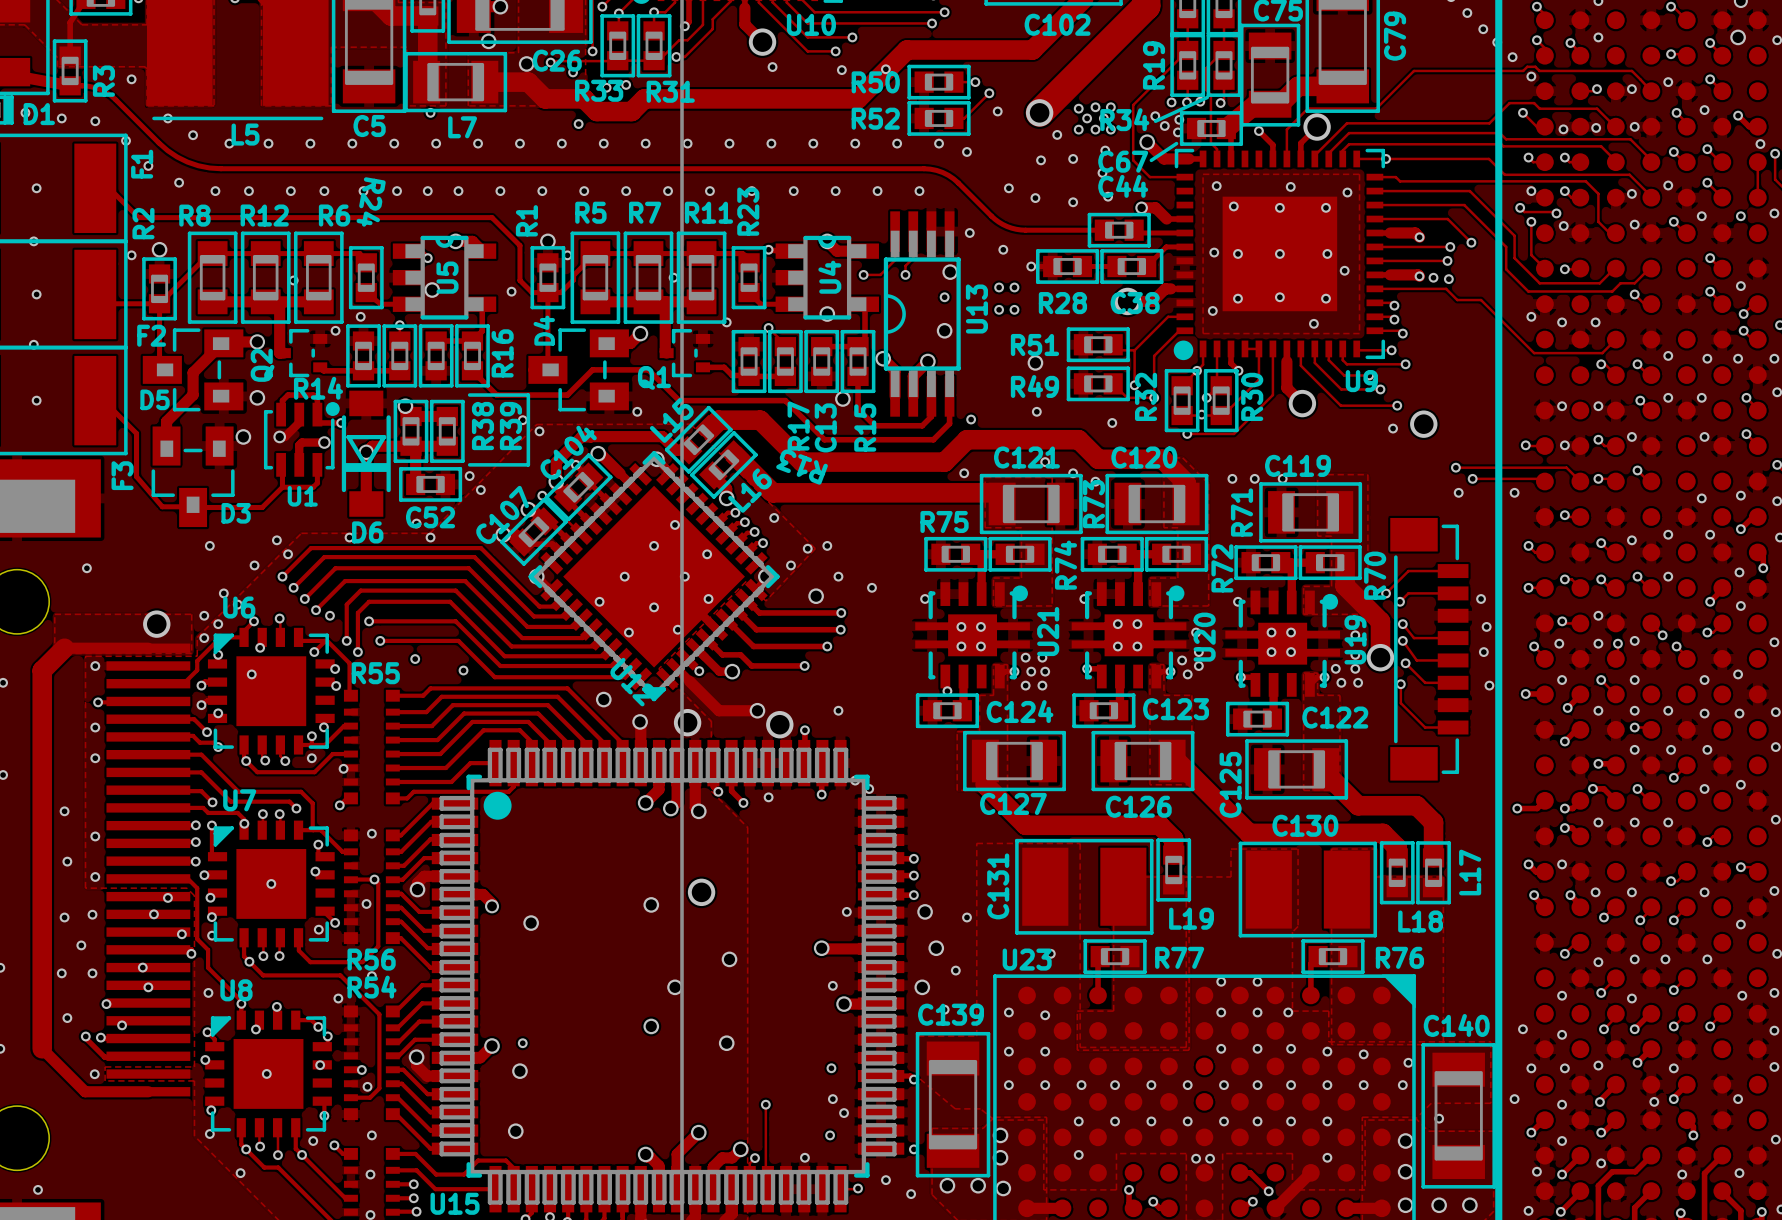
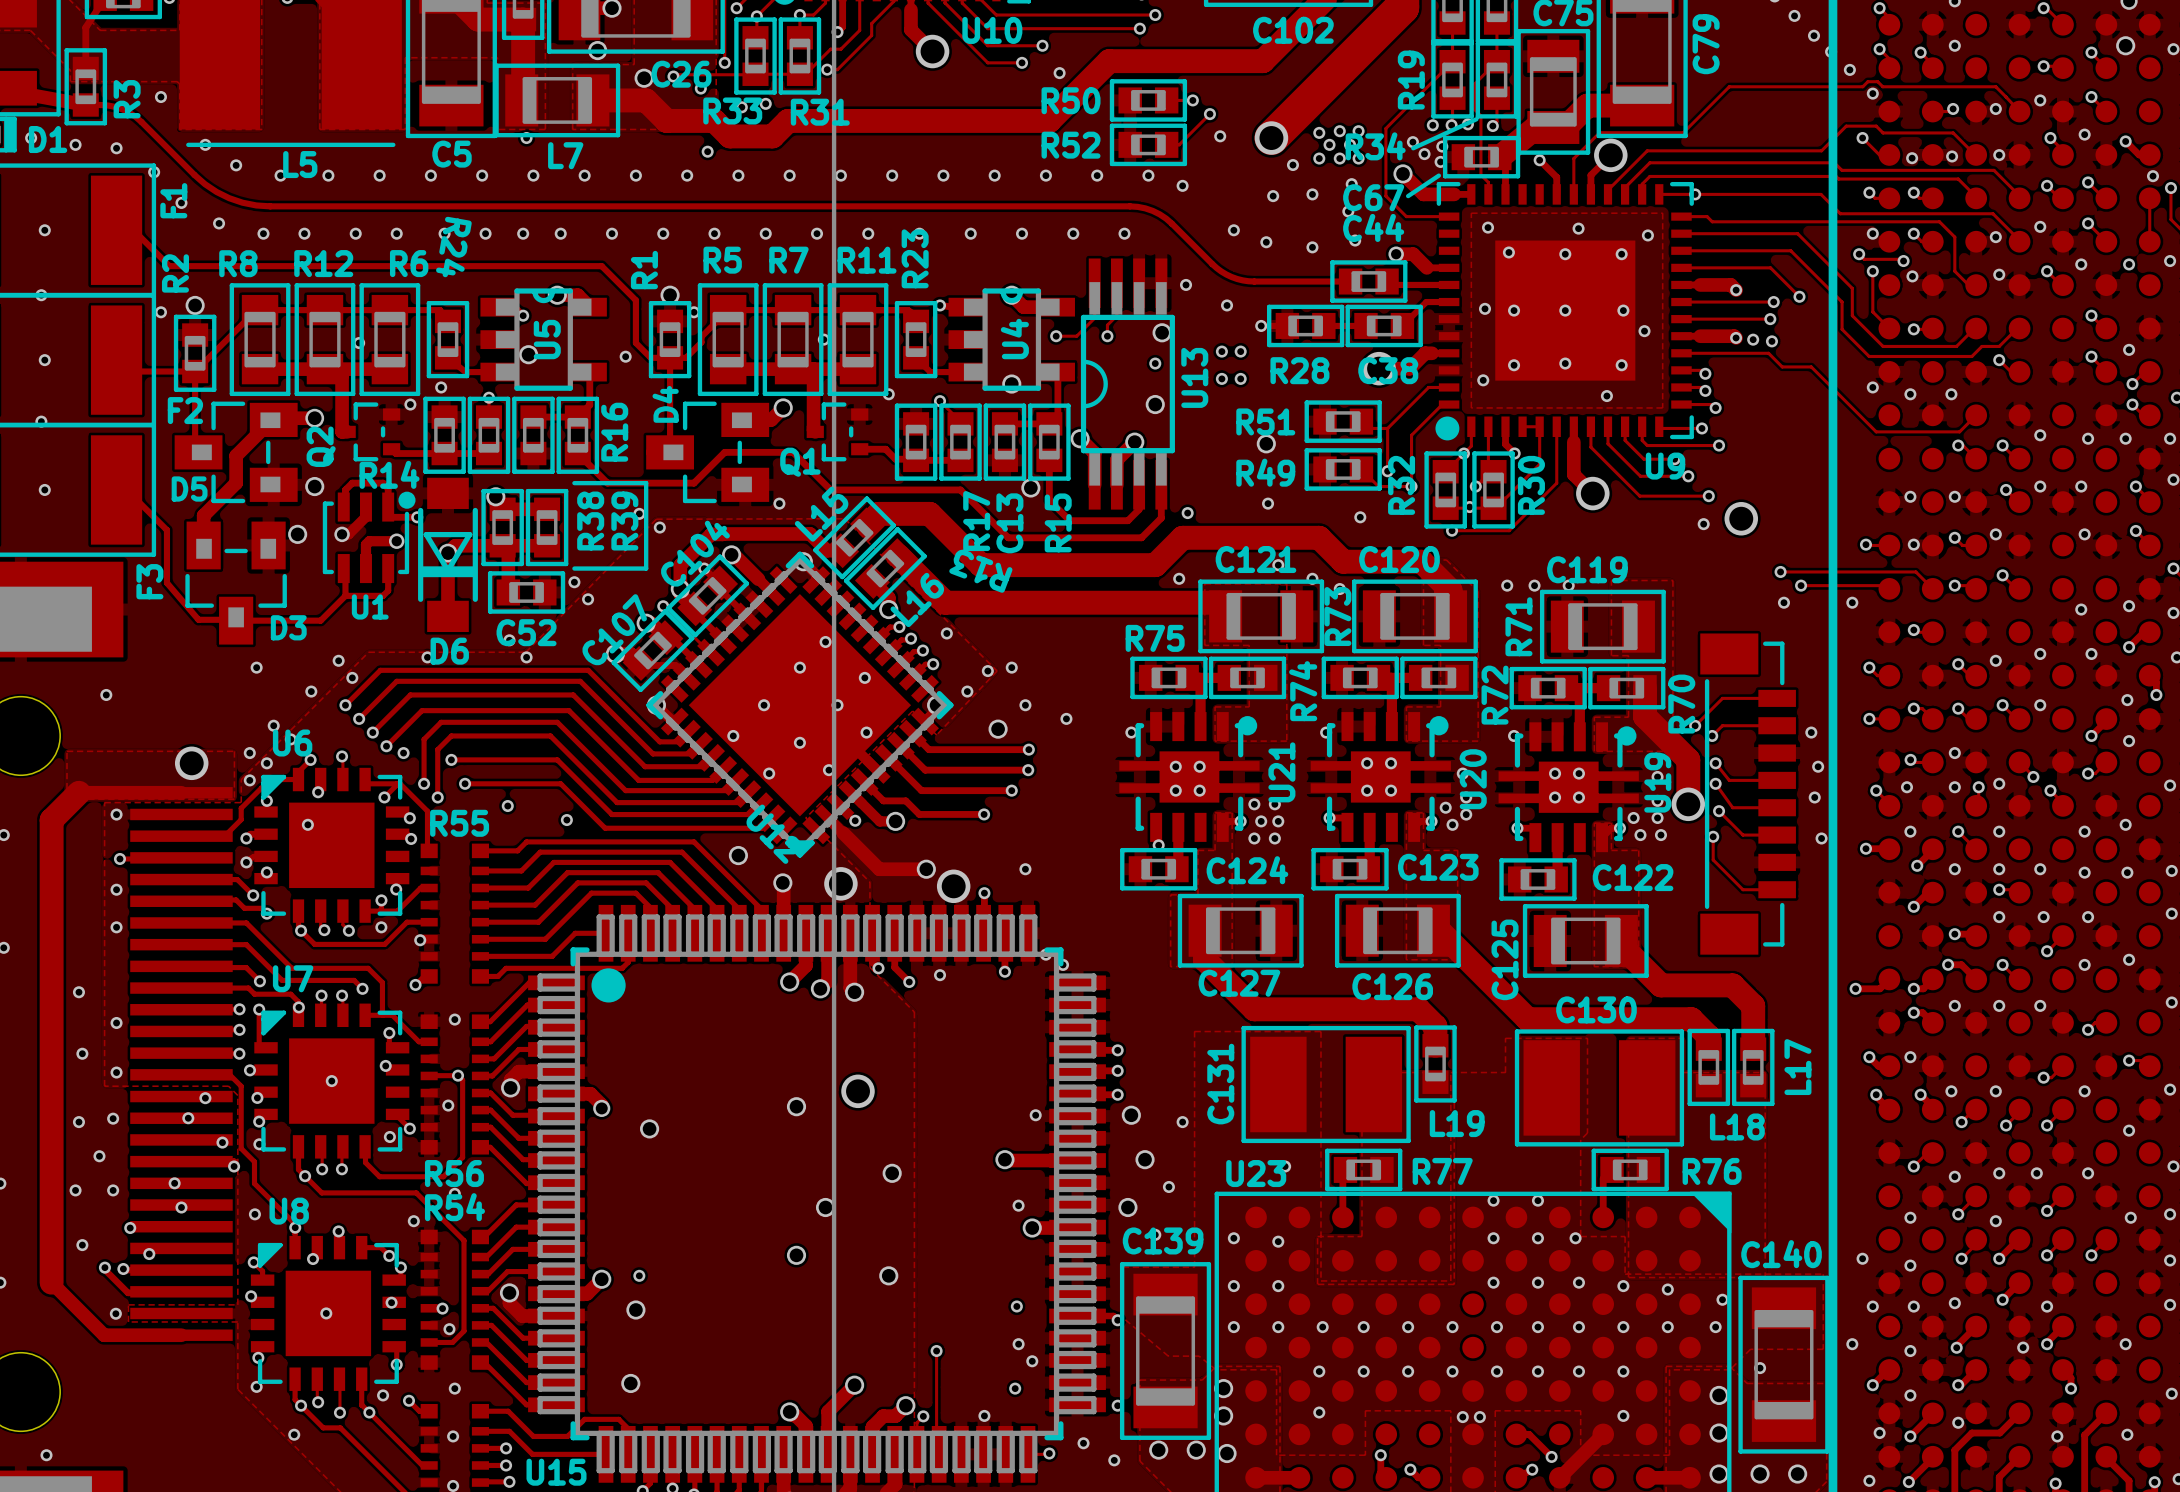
via: none -> (1059, 73)
via: (772, 67) -> none
via: (885, 69) -> none
via: (841, 70) -> none

